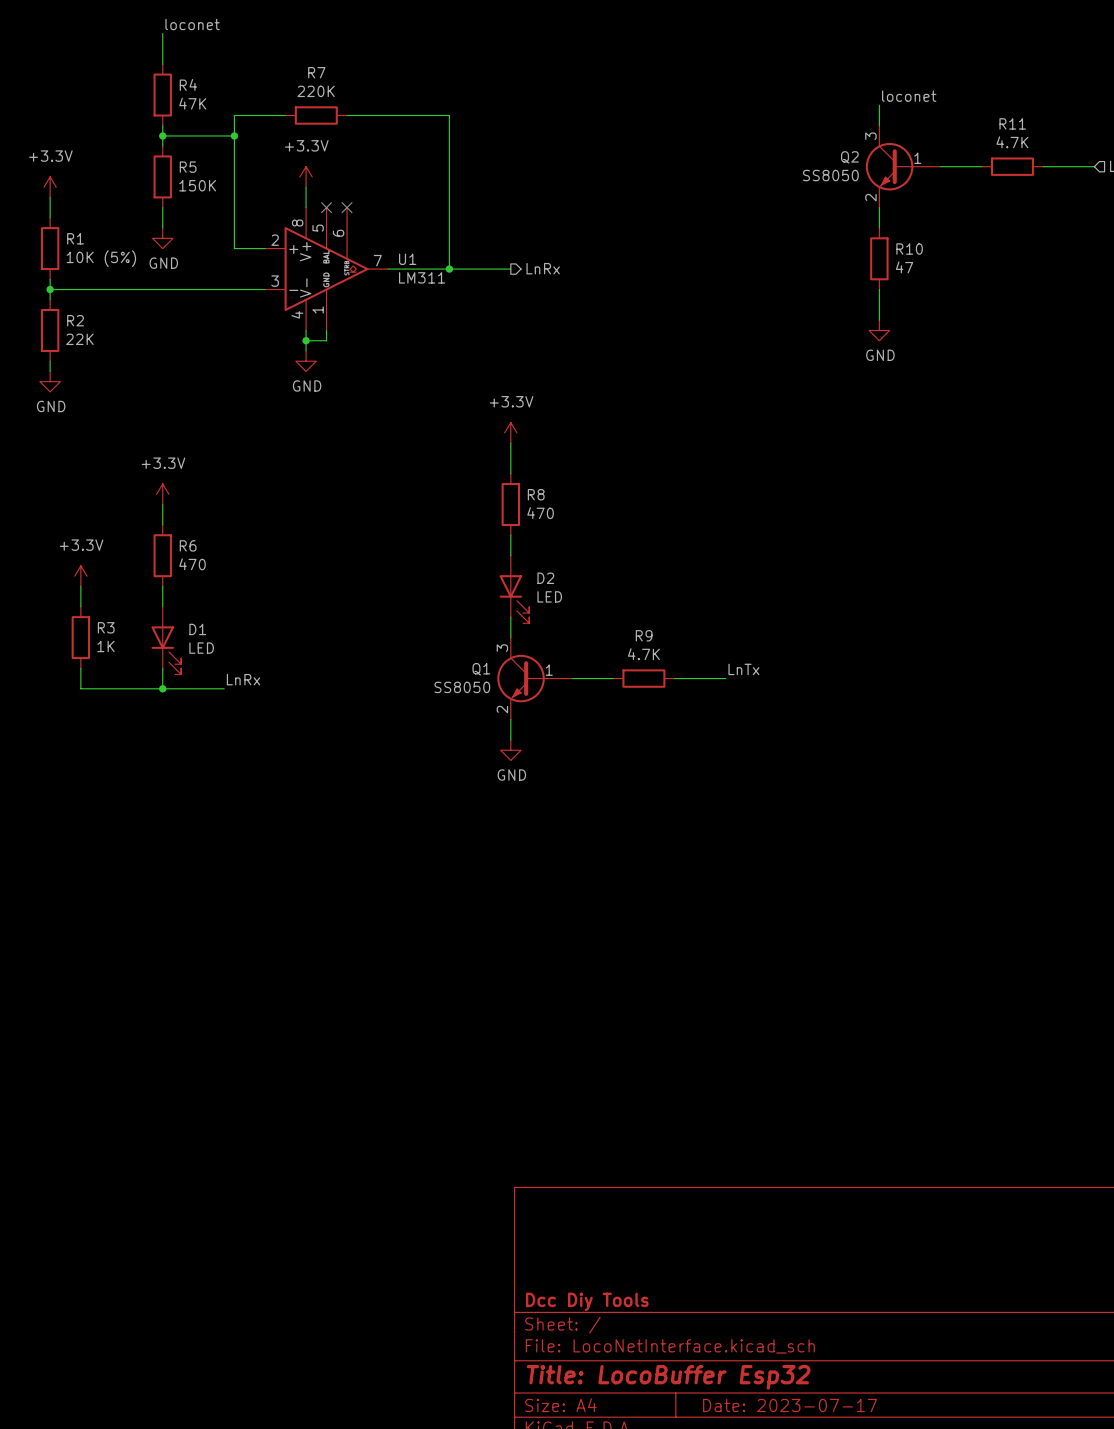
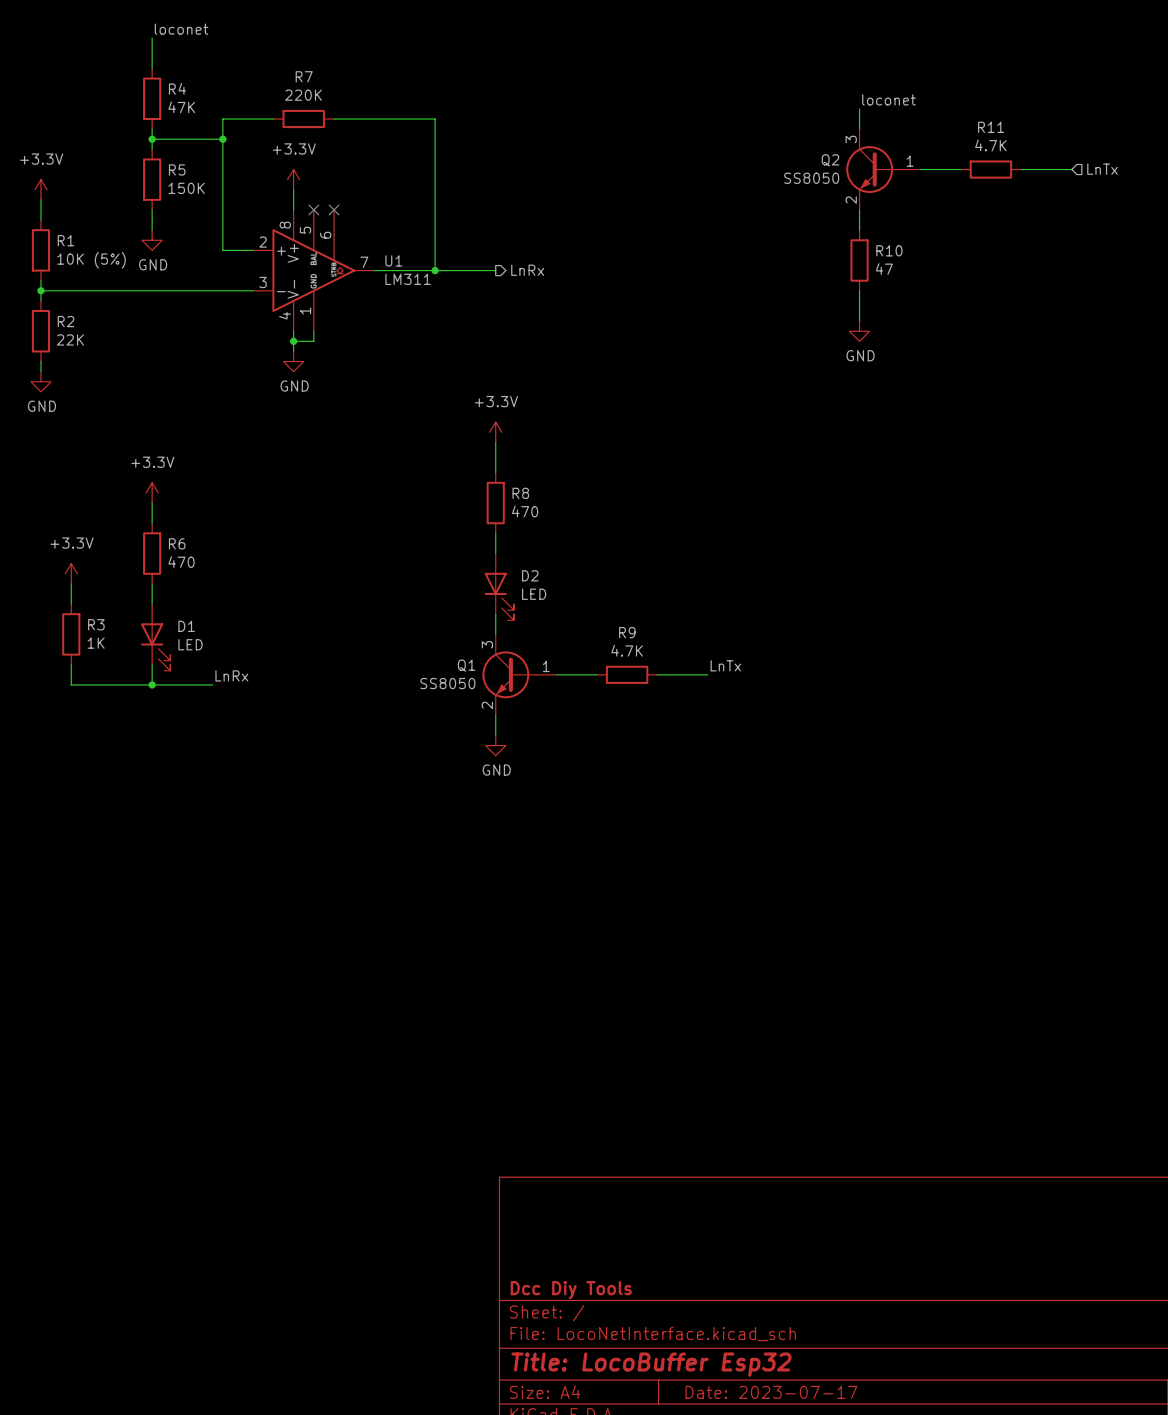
Q2 symbol: [865, 125, 941, 208] -> [846, 129, 921, 210]
Q1 symbol: [497, 637, 573, 720] -> [482, 634, 557, 716]

